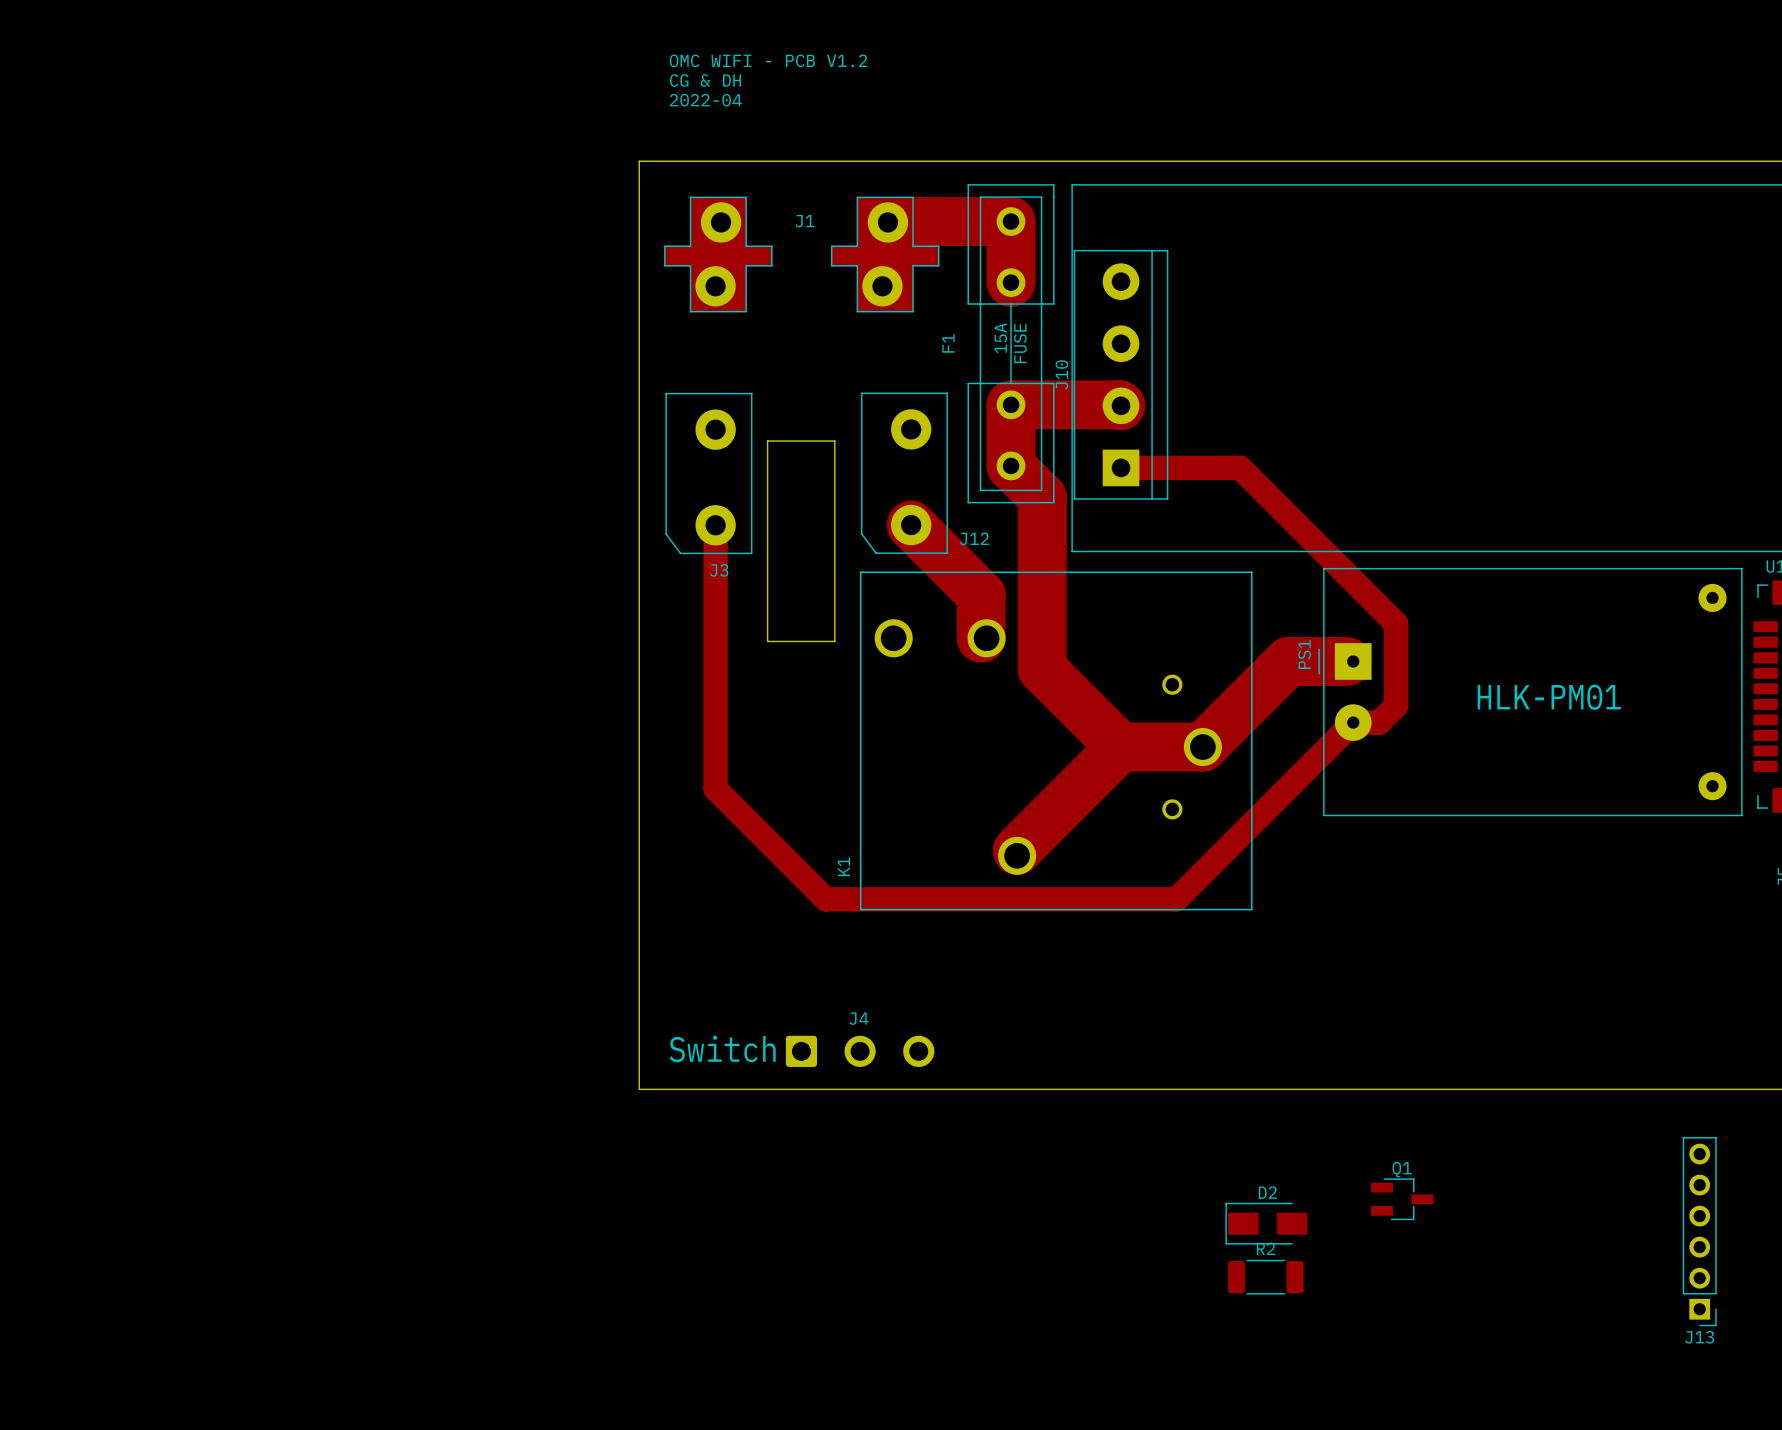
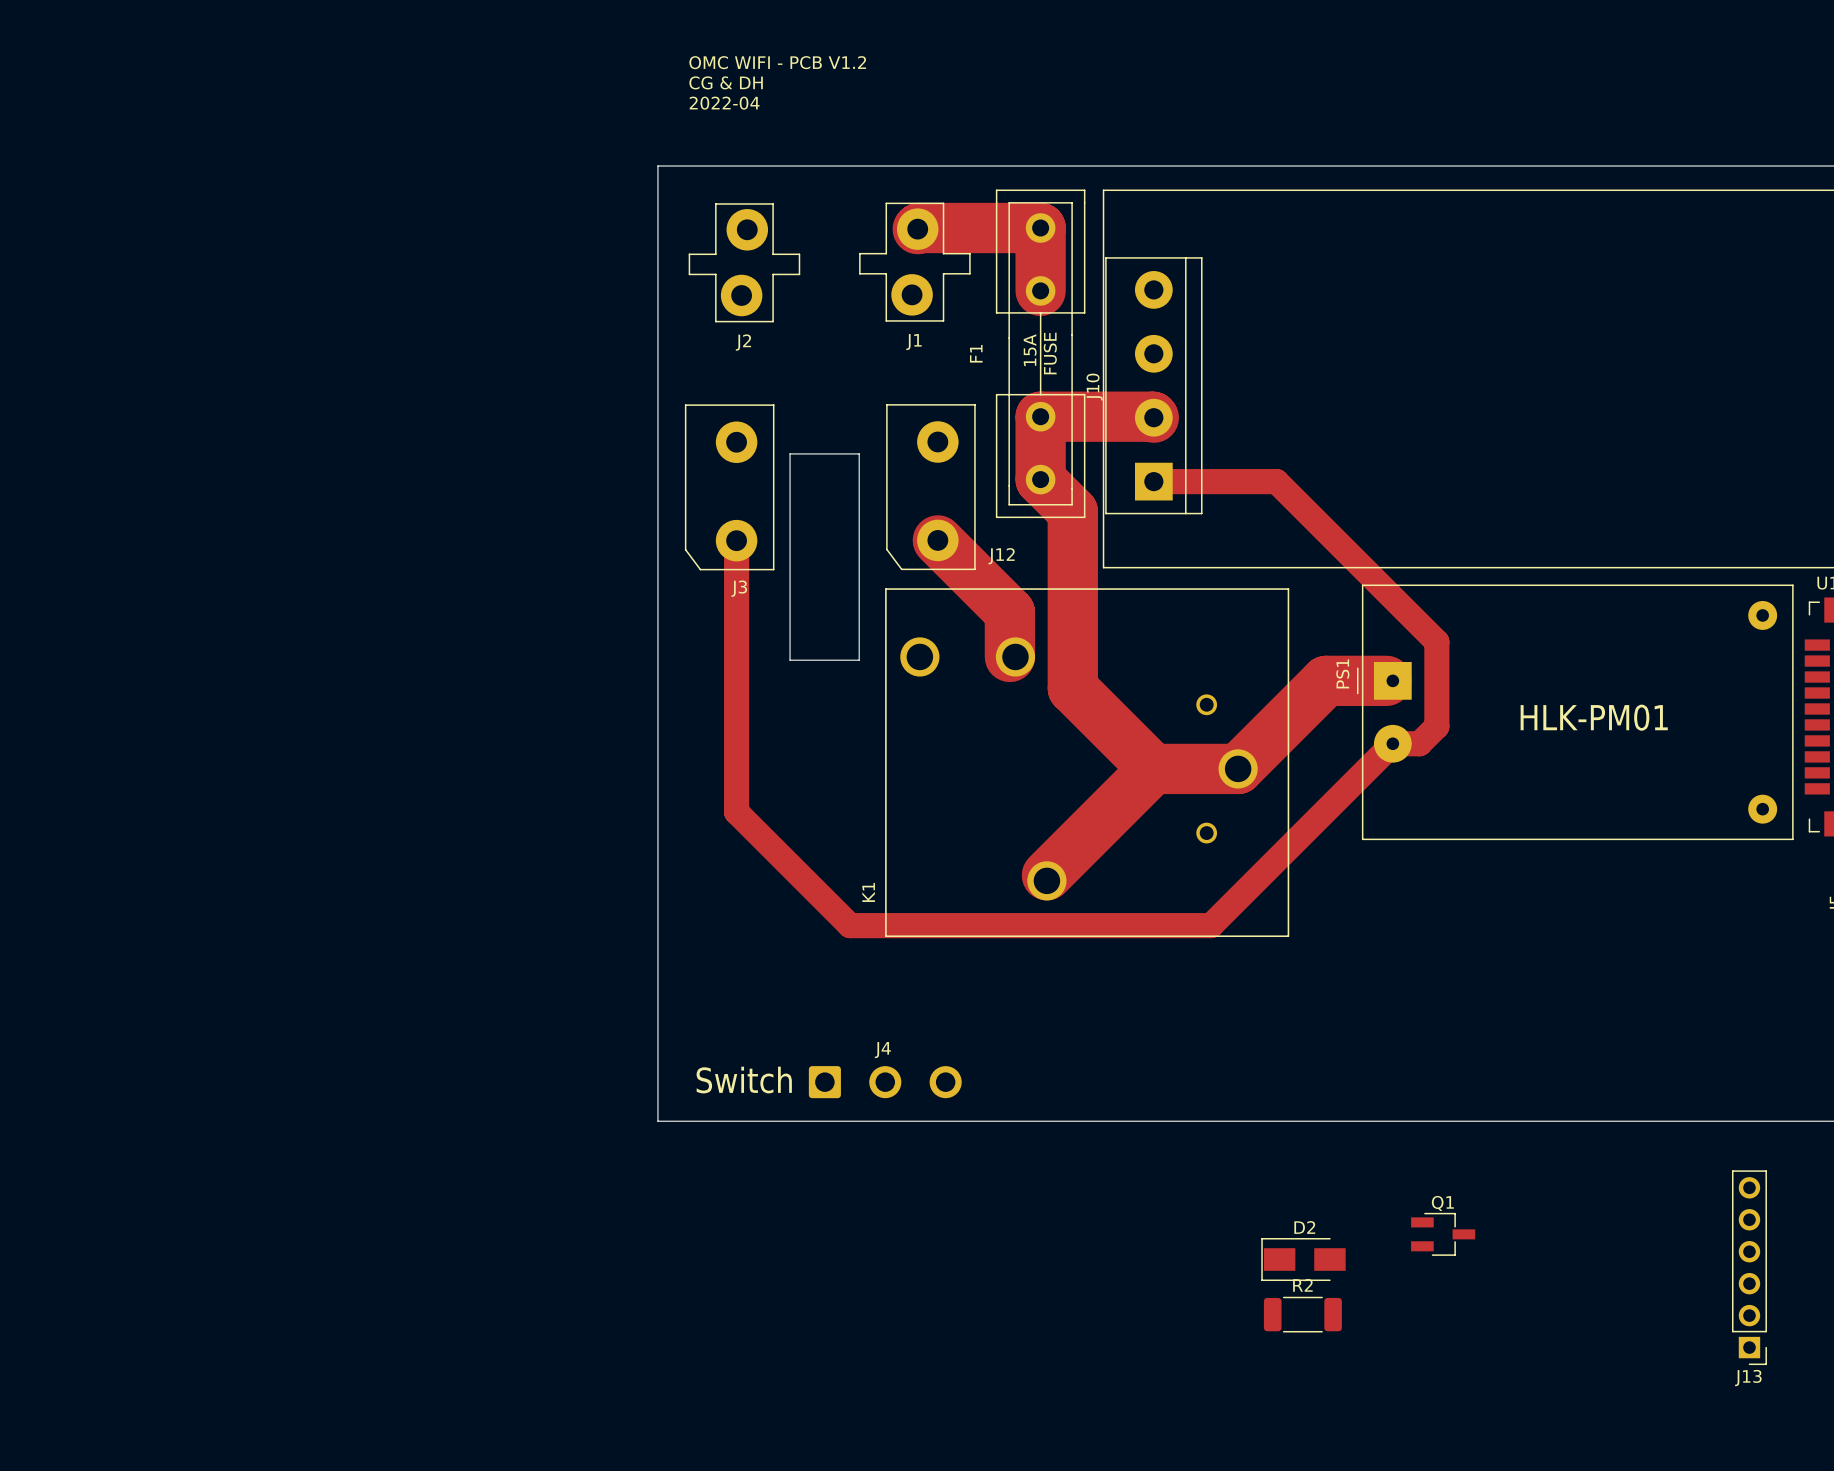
J1 footprint: [664, 196, 940, 313] -> [859, 202, 971, 322]
J1 name position: J1 (805, 221) -> J1 (913, 342)
J2: none -> (744, 262)

